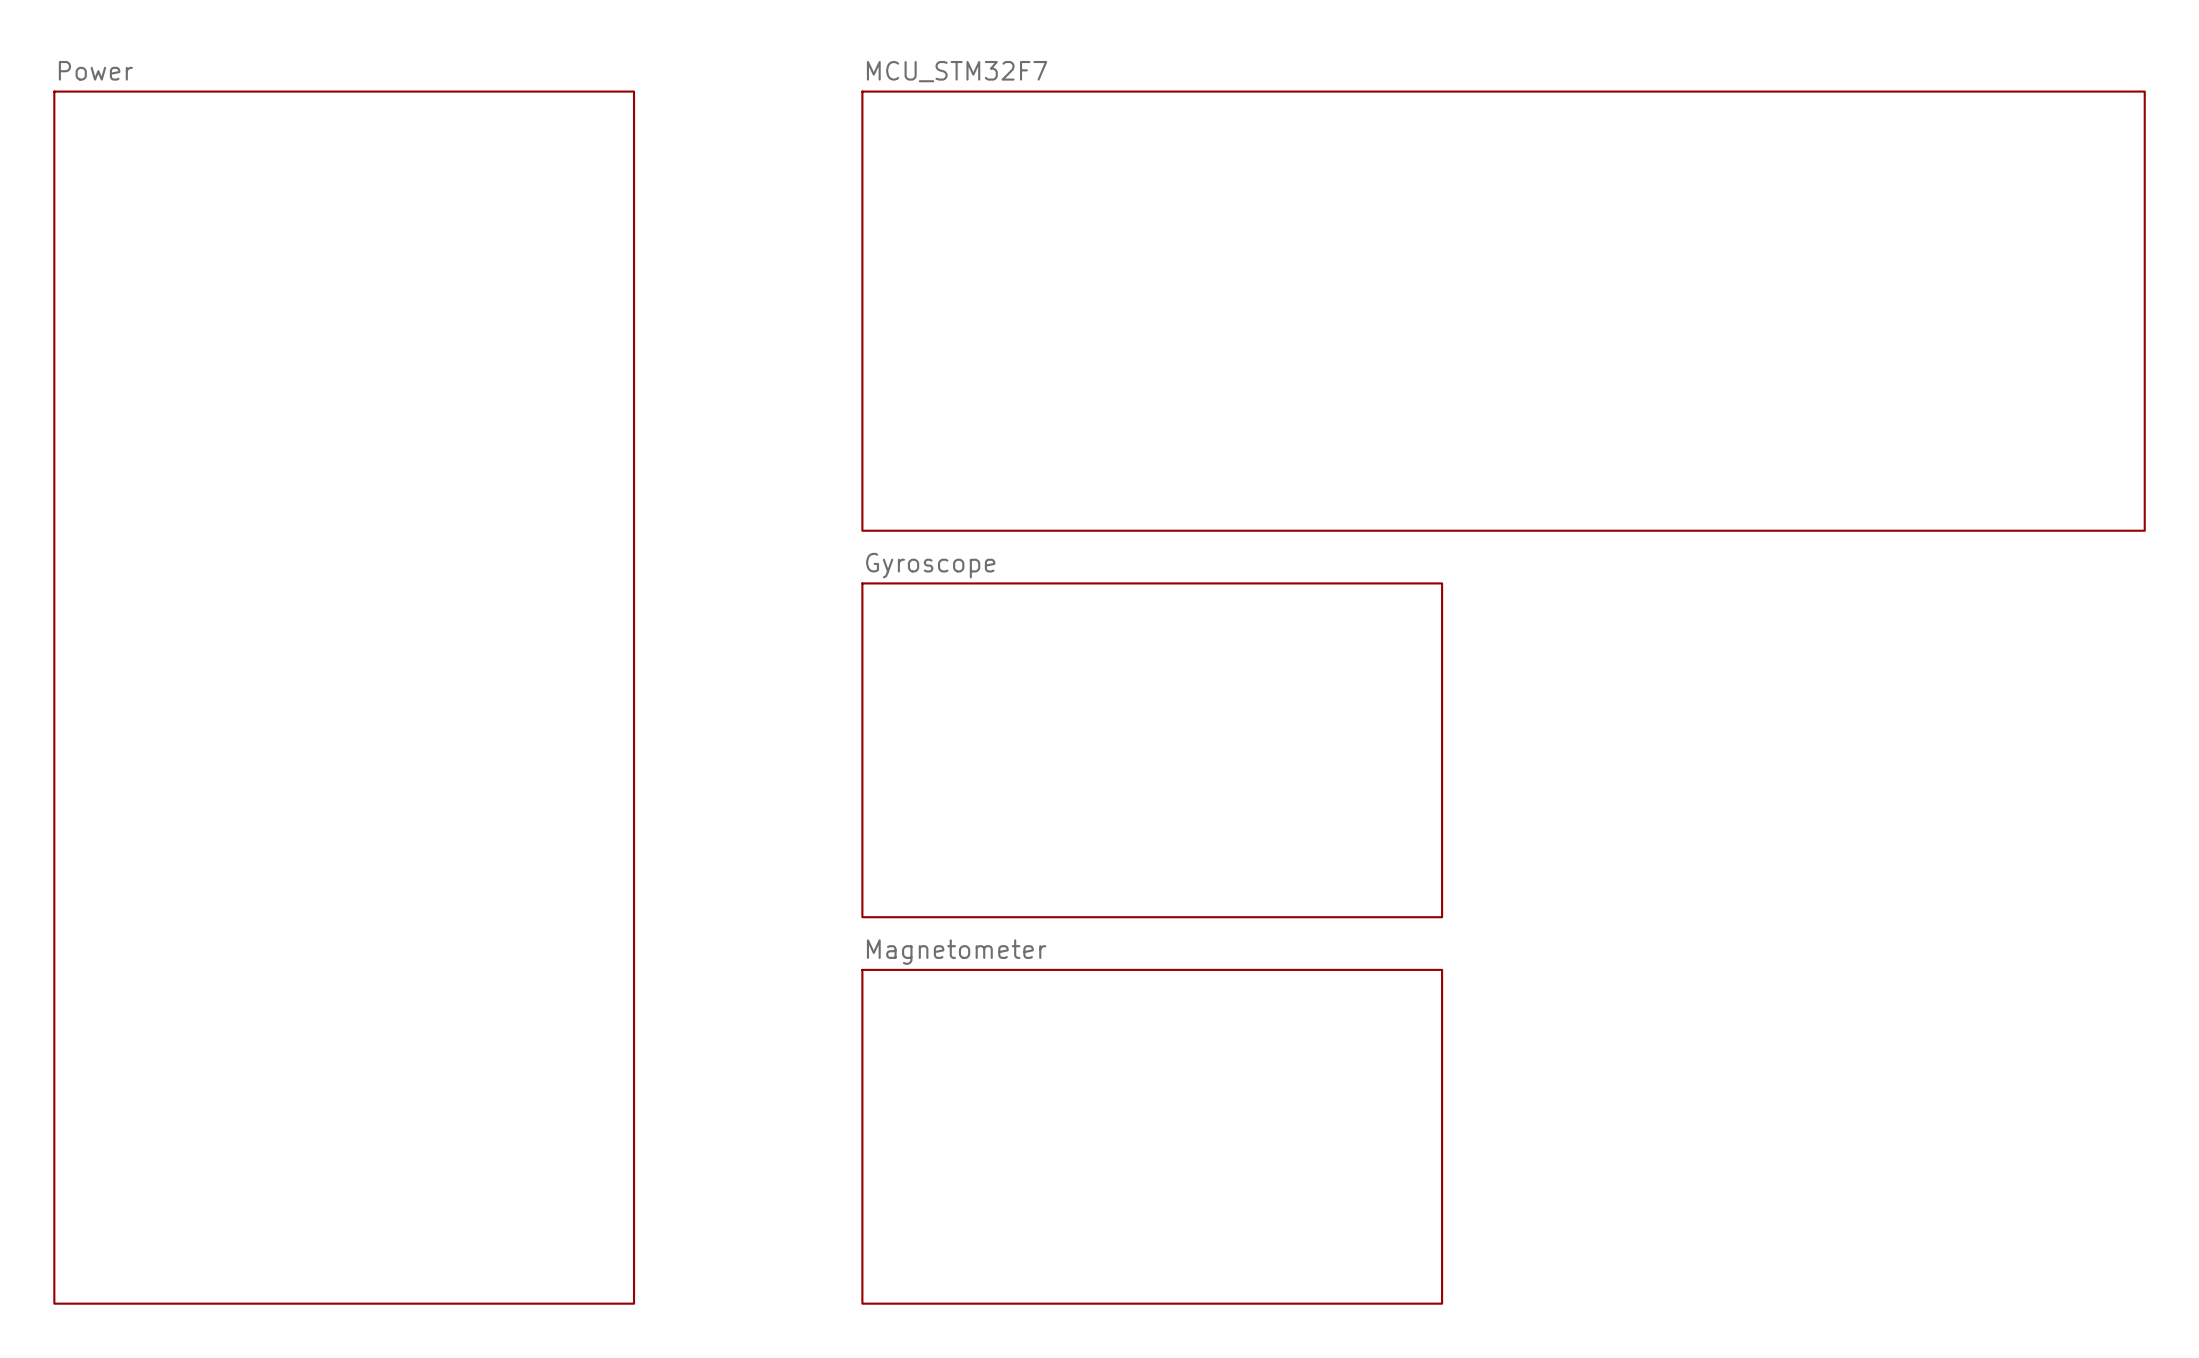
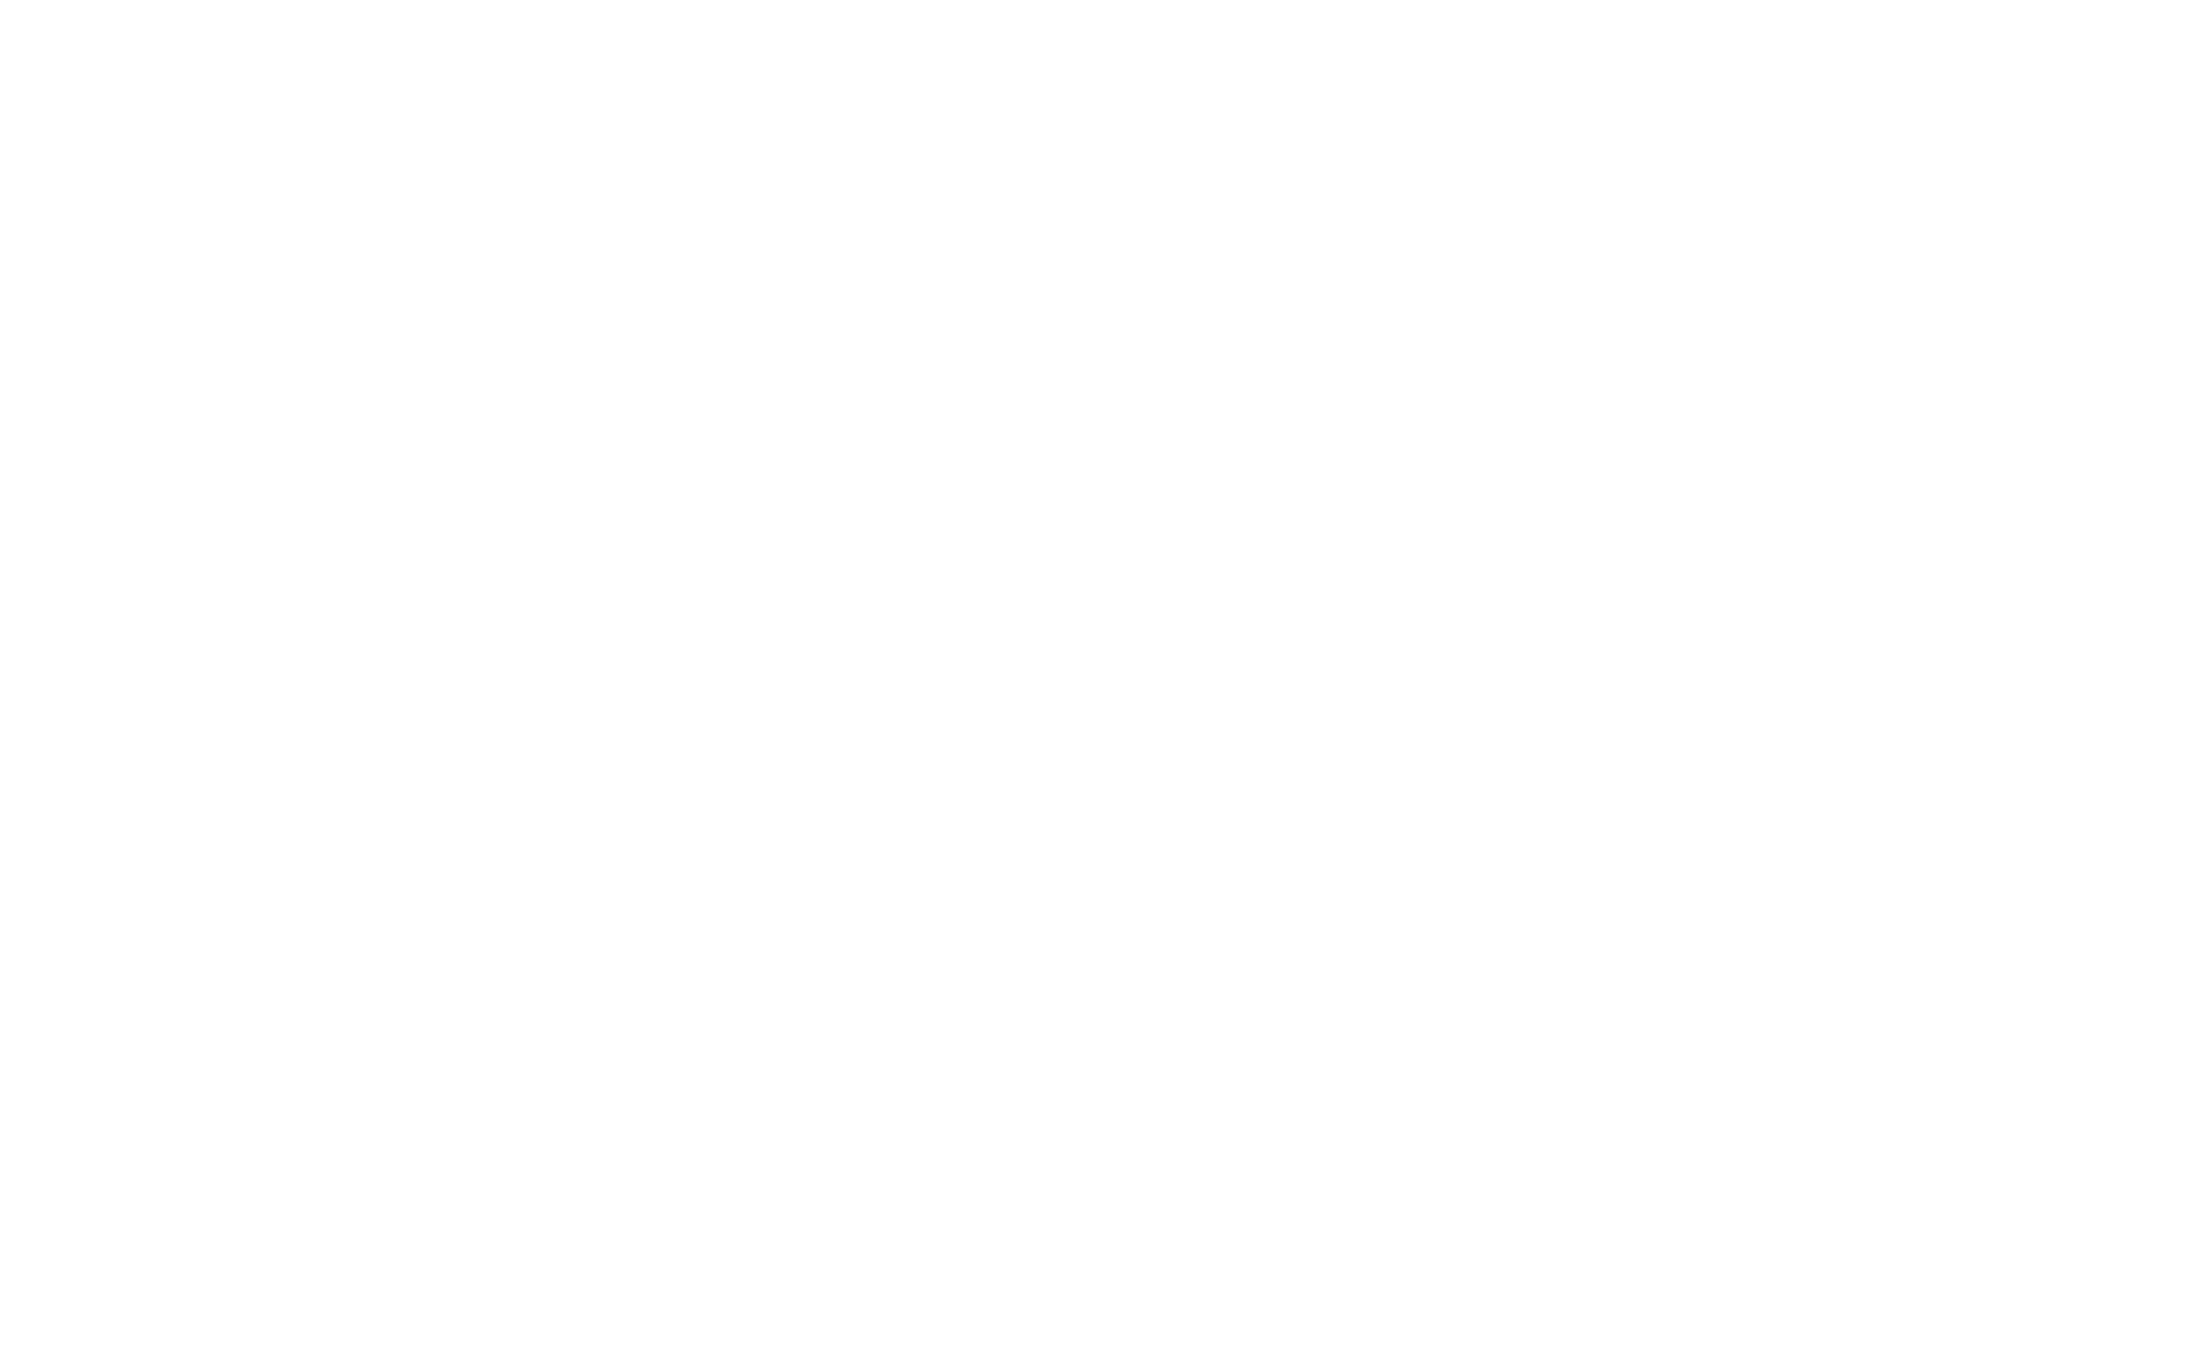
sheet MCU_STM32F7: (1503, 311) -> none
sheet Power: (344, 697) -> none
sheet Gyroscope: (1152, 750) -> none
sheet Magnetometer: (1152, 1136) -> none

